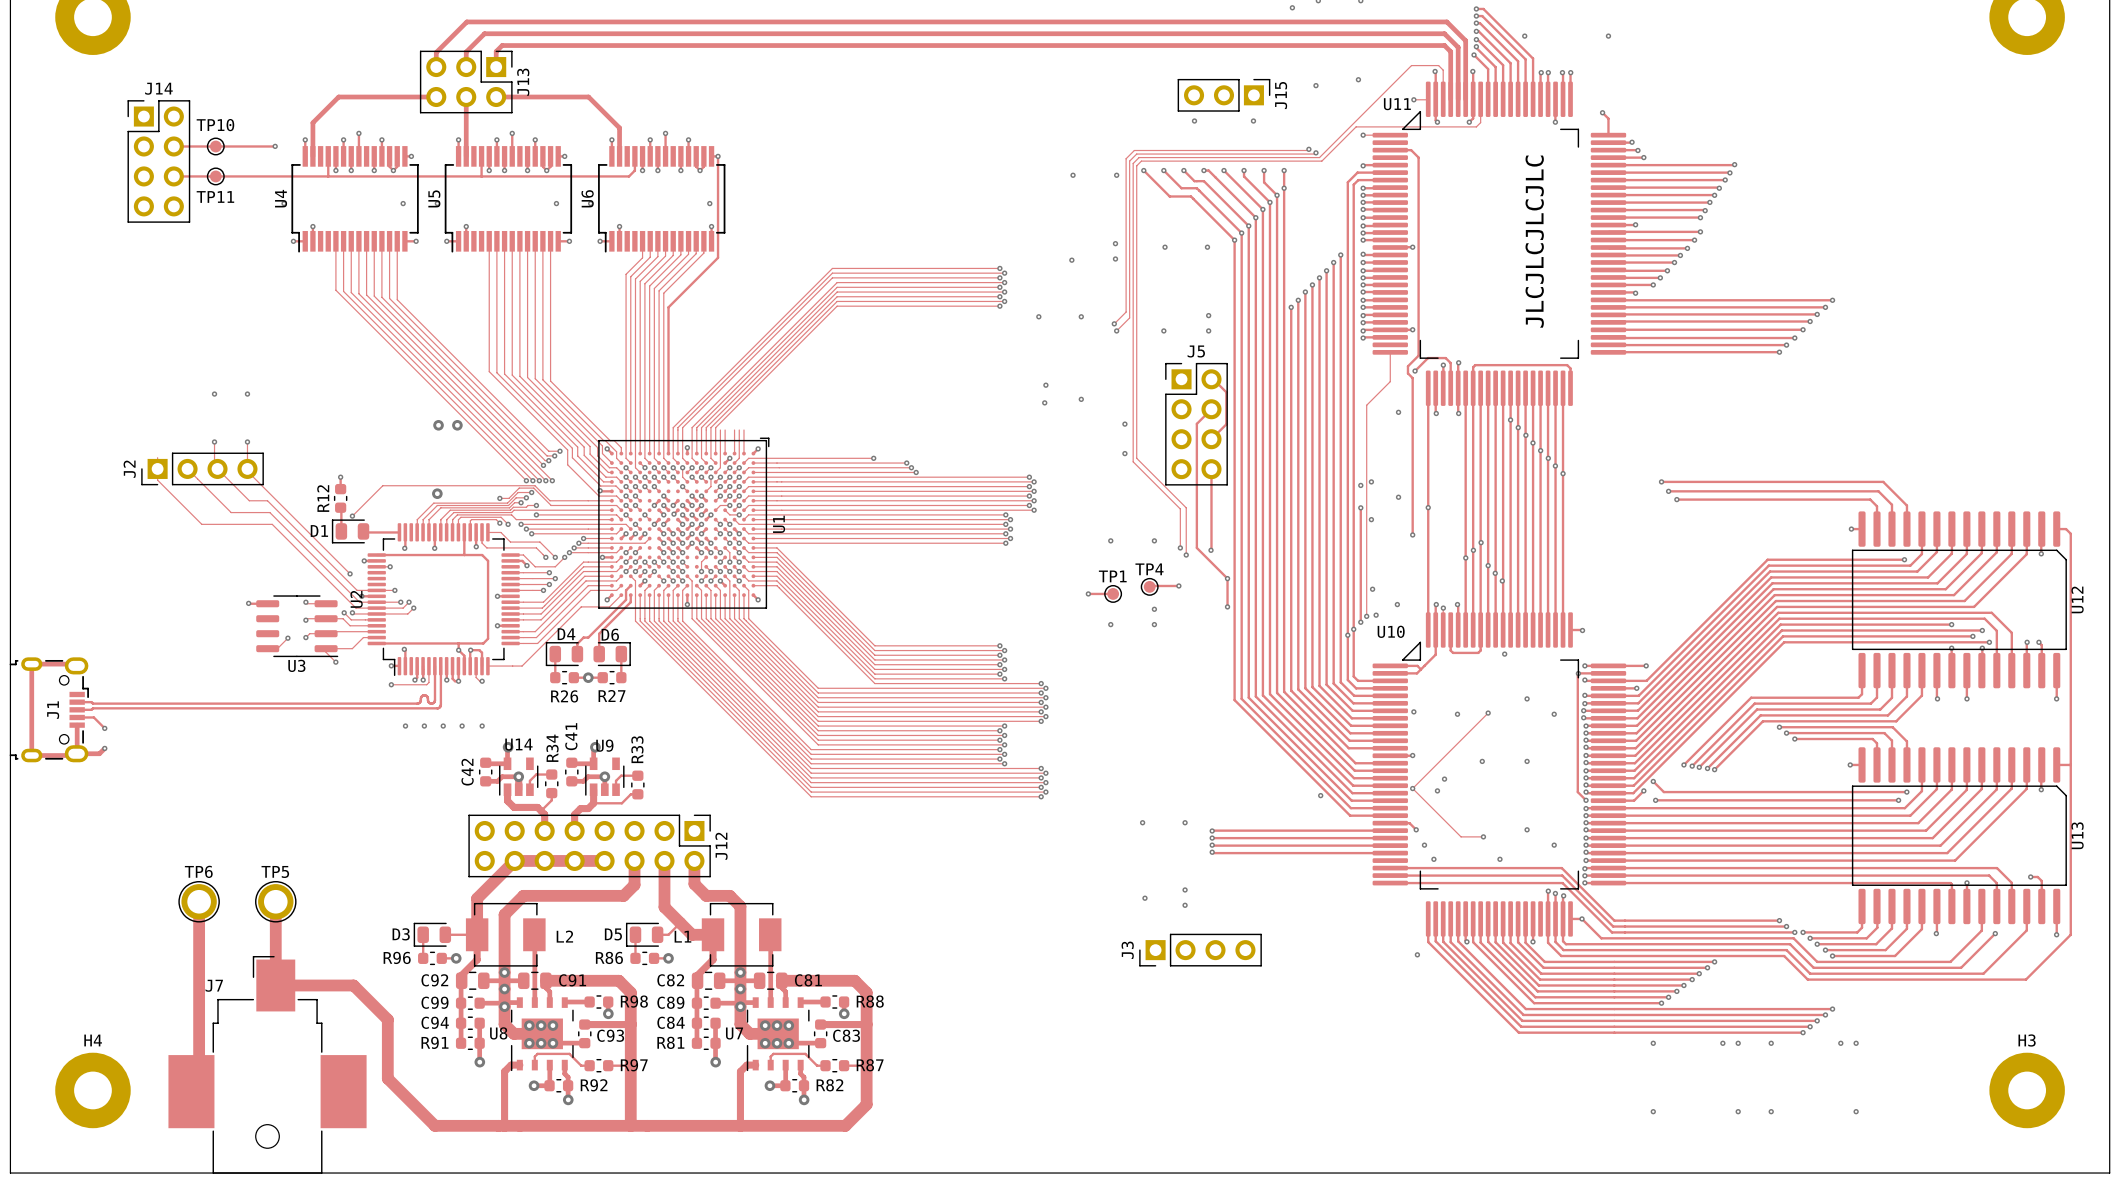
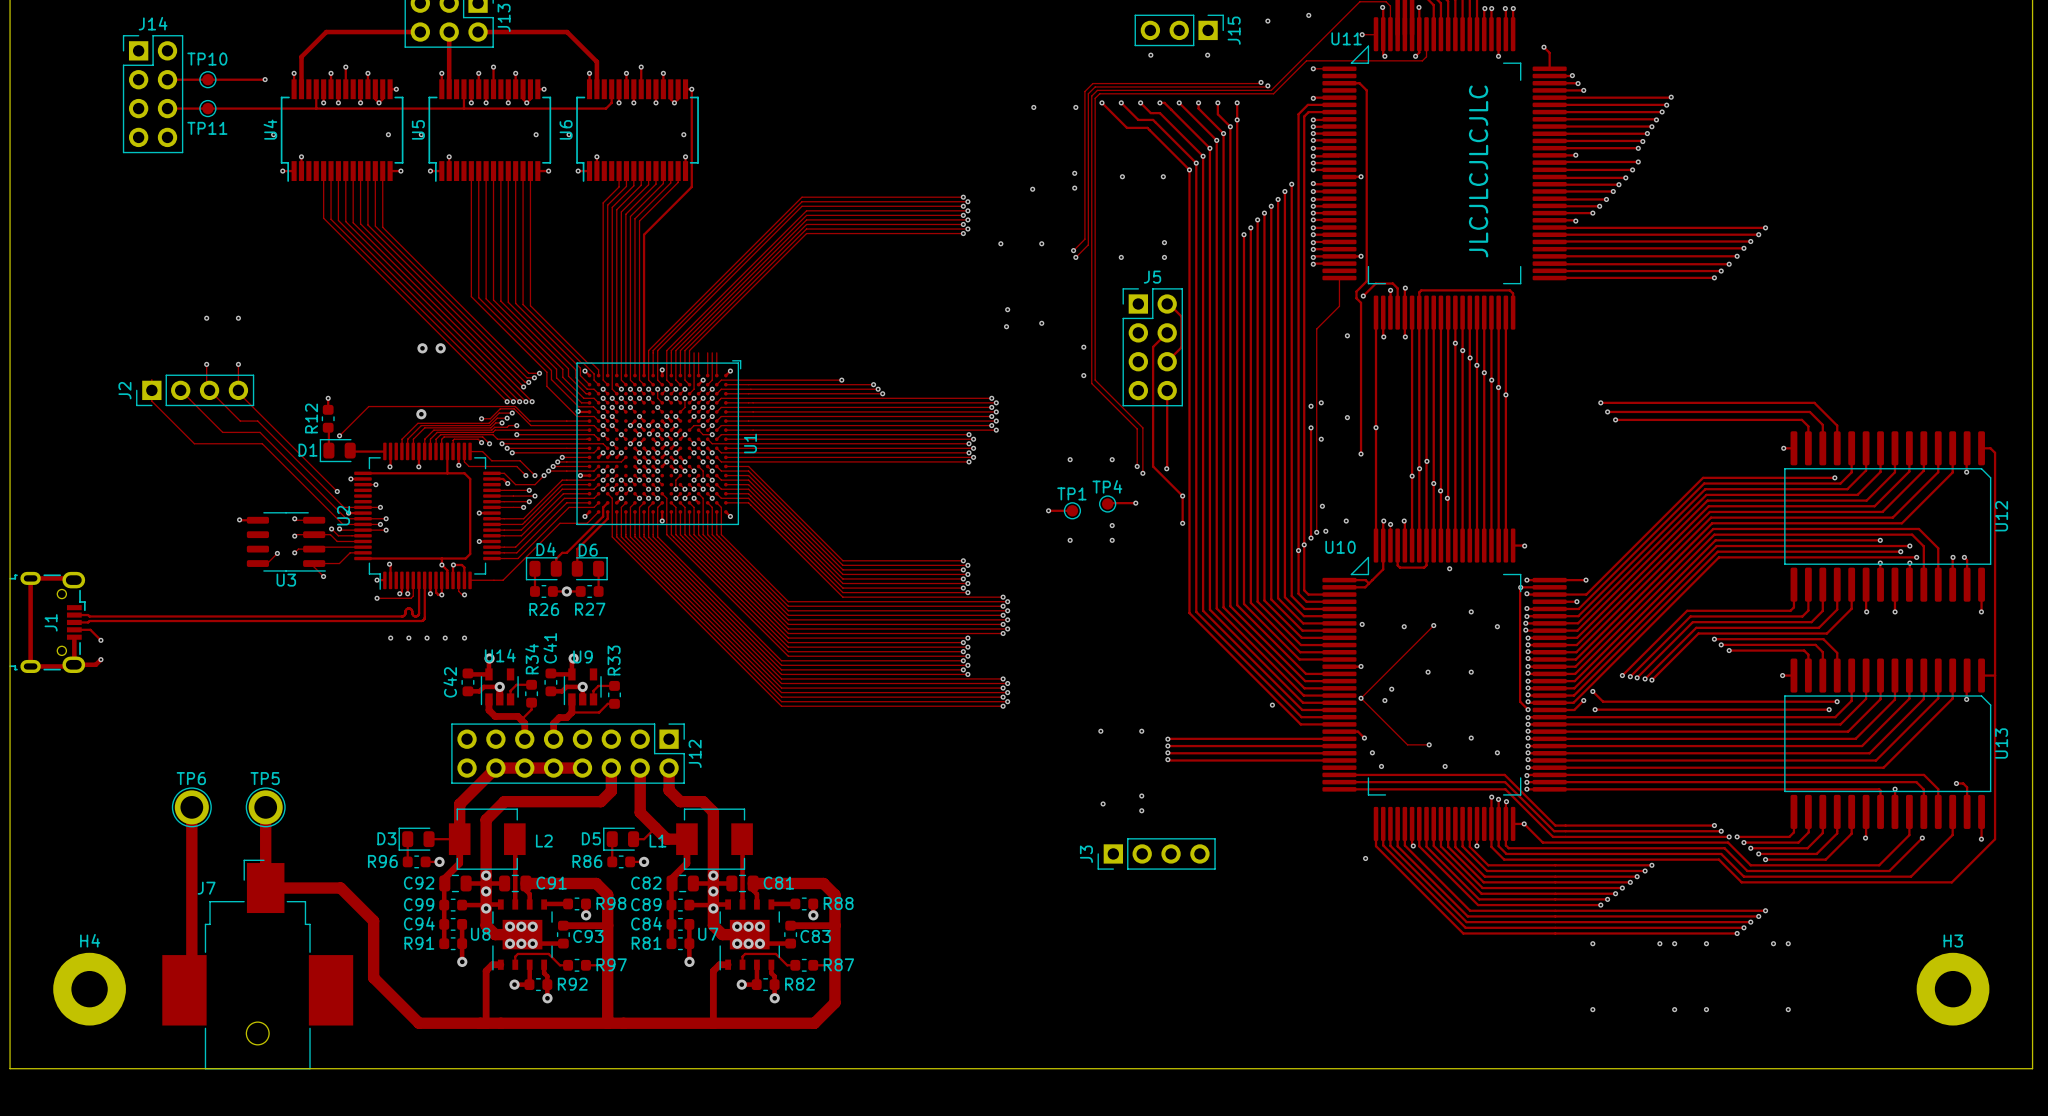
track: (409, 602) (403, 608) (394, 608) -> none
via: (409, 602) -> none
via: none -> (380, 524)
track: (413, 608) (407, 613) (400, 613) -> none
via: (413, 608) -> none
via: none -> (386, 530)

